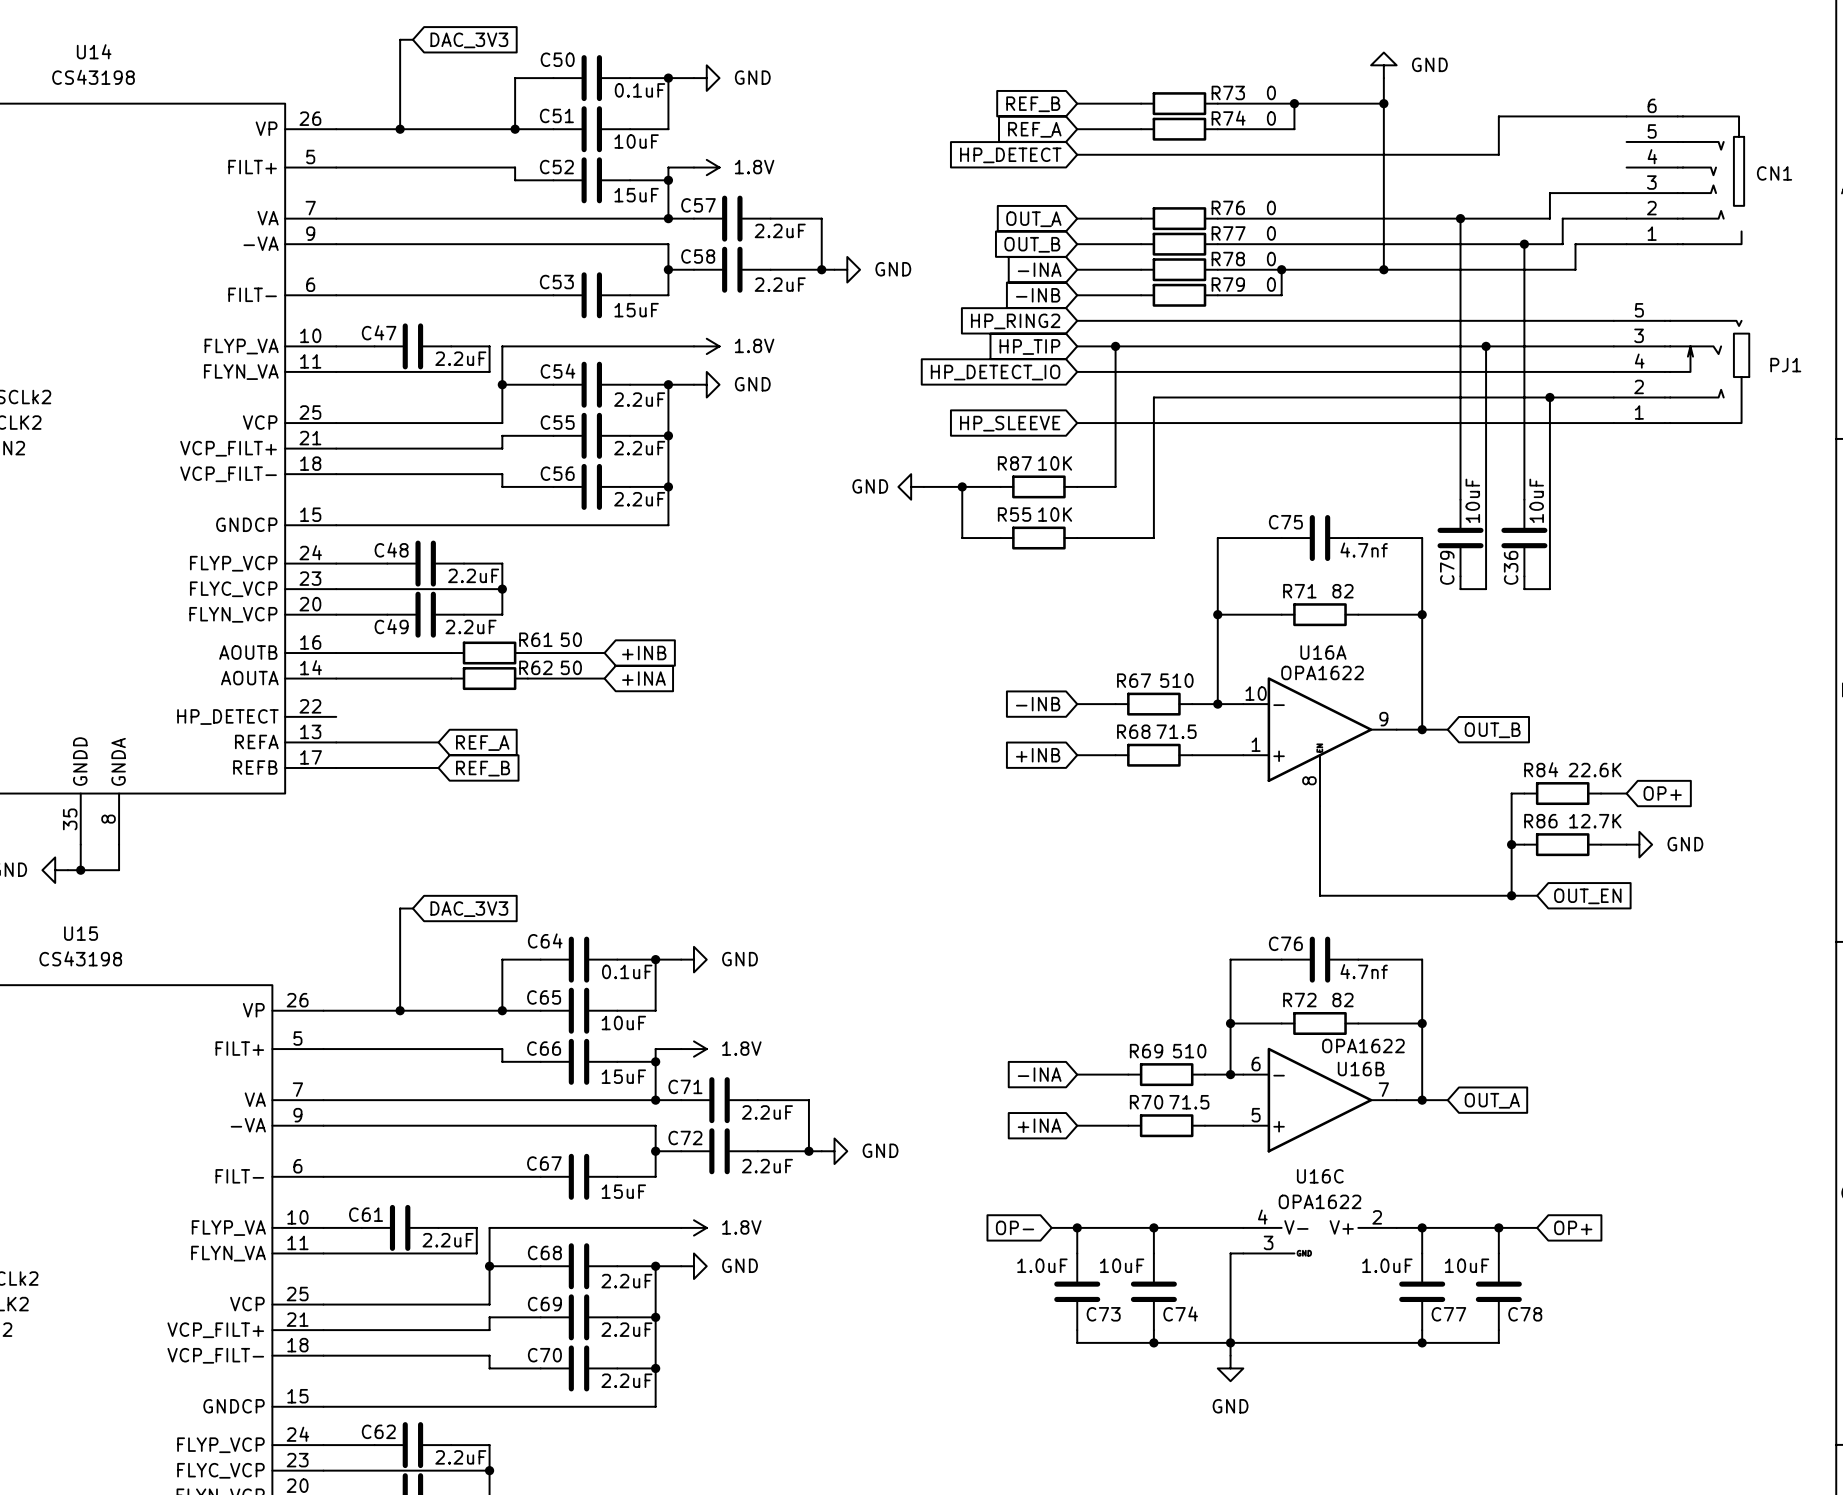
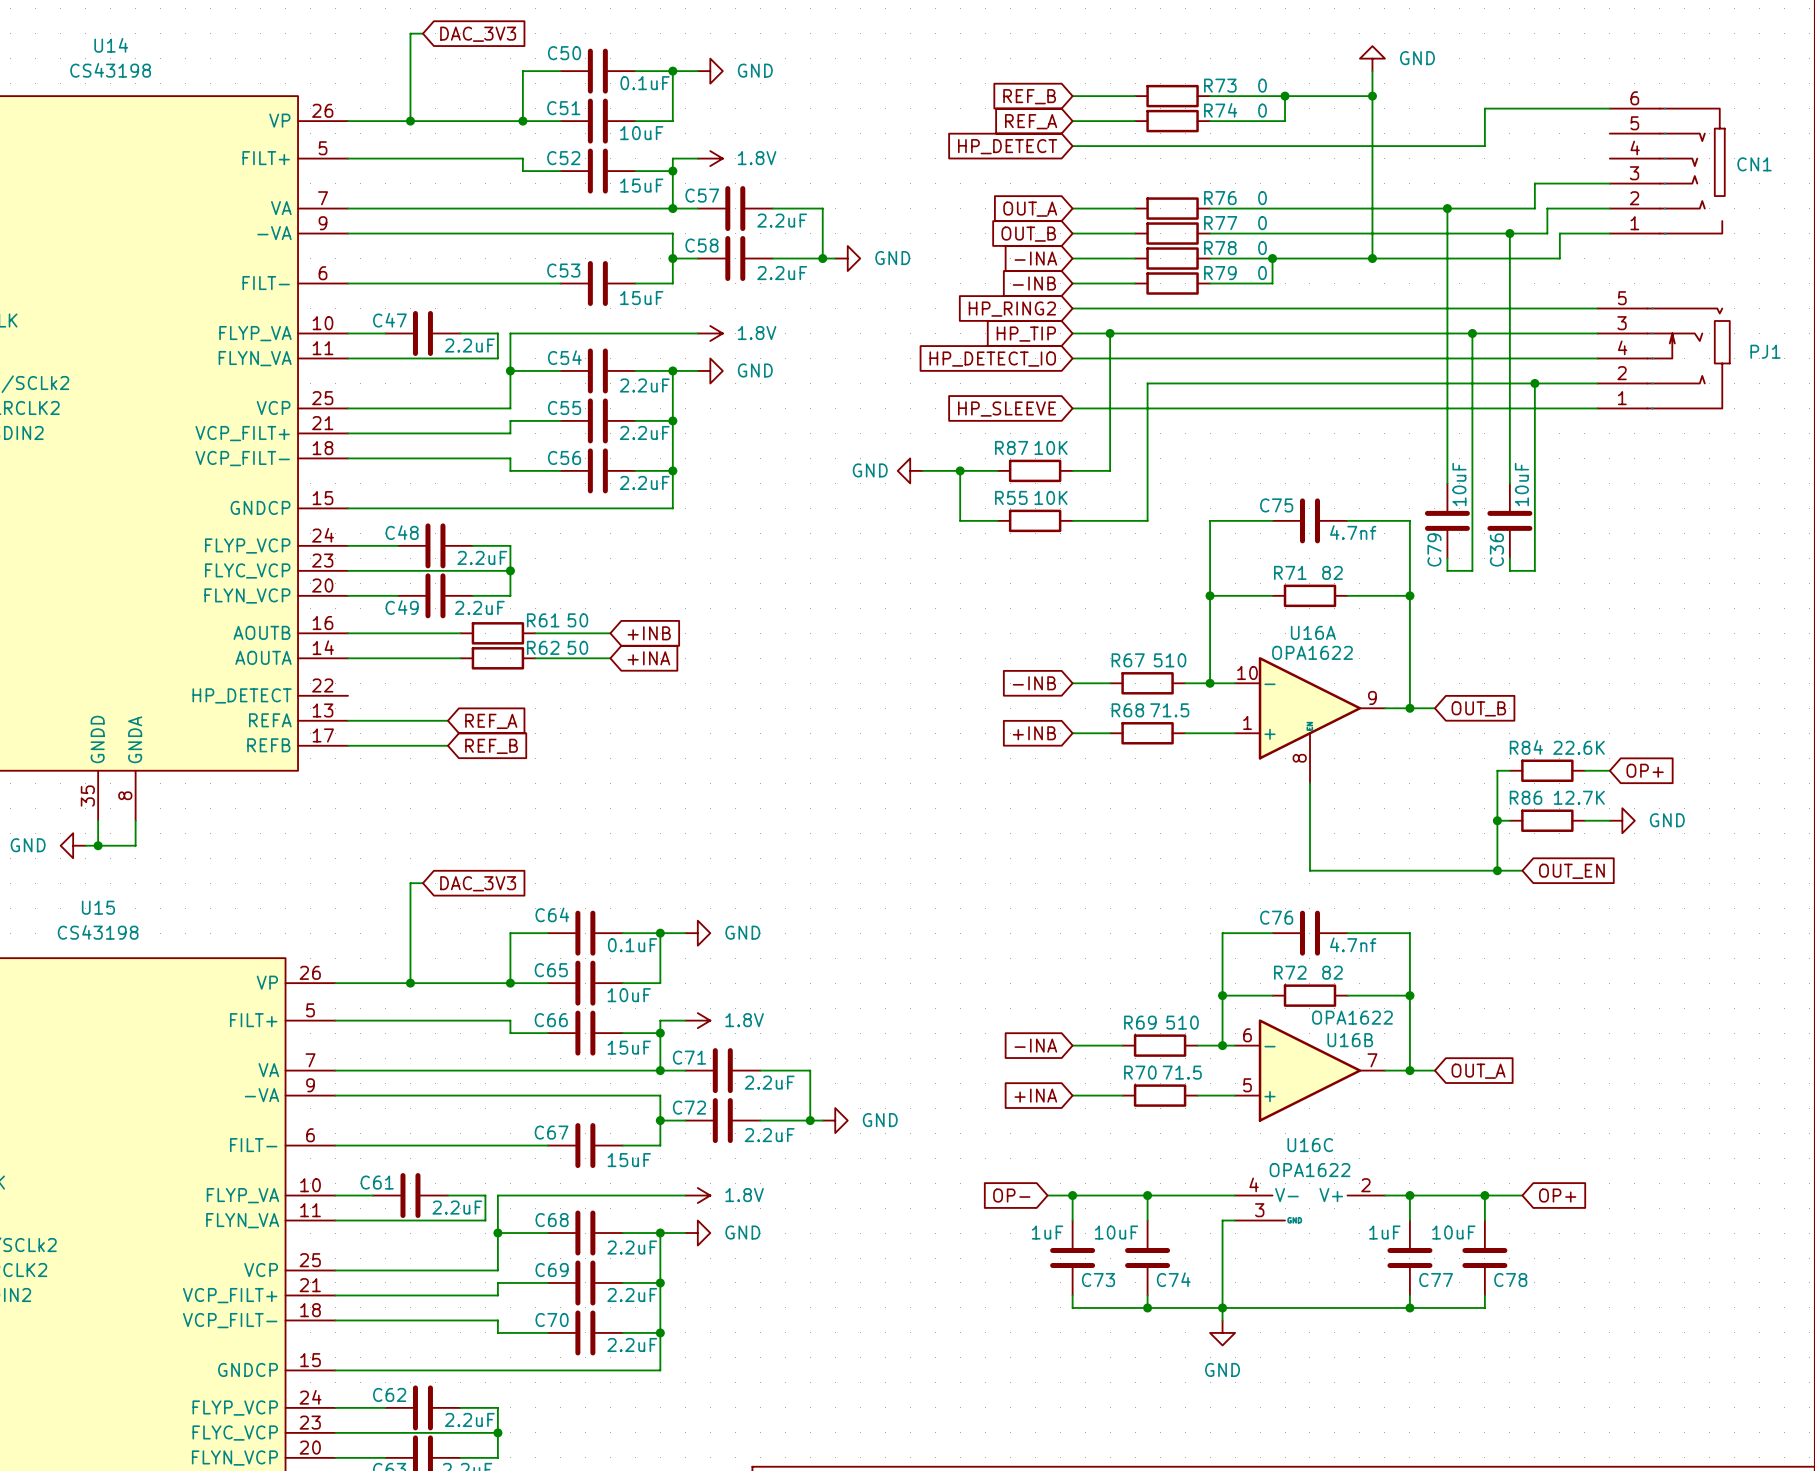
C73 value: 1.0uF (1042, 1265) -> 1uF (1047, 1232)
C77 value: 1.0uF (1387, 1265) -> 1uF (1384, 1232)

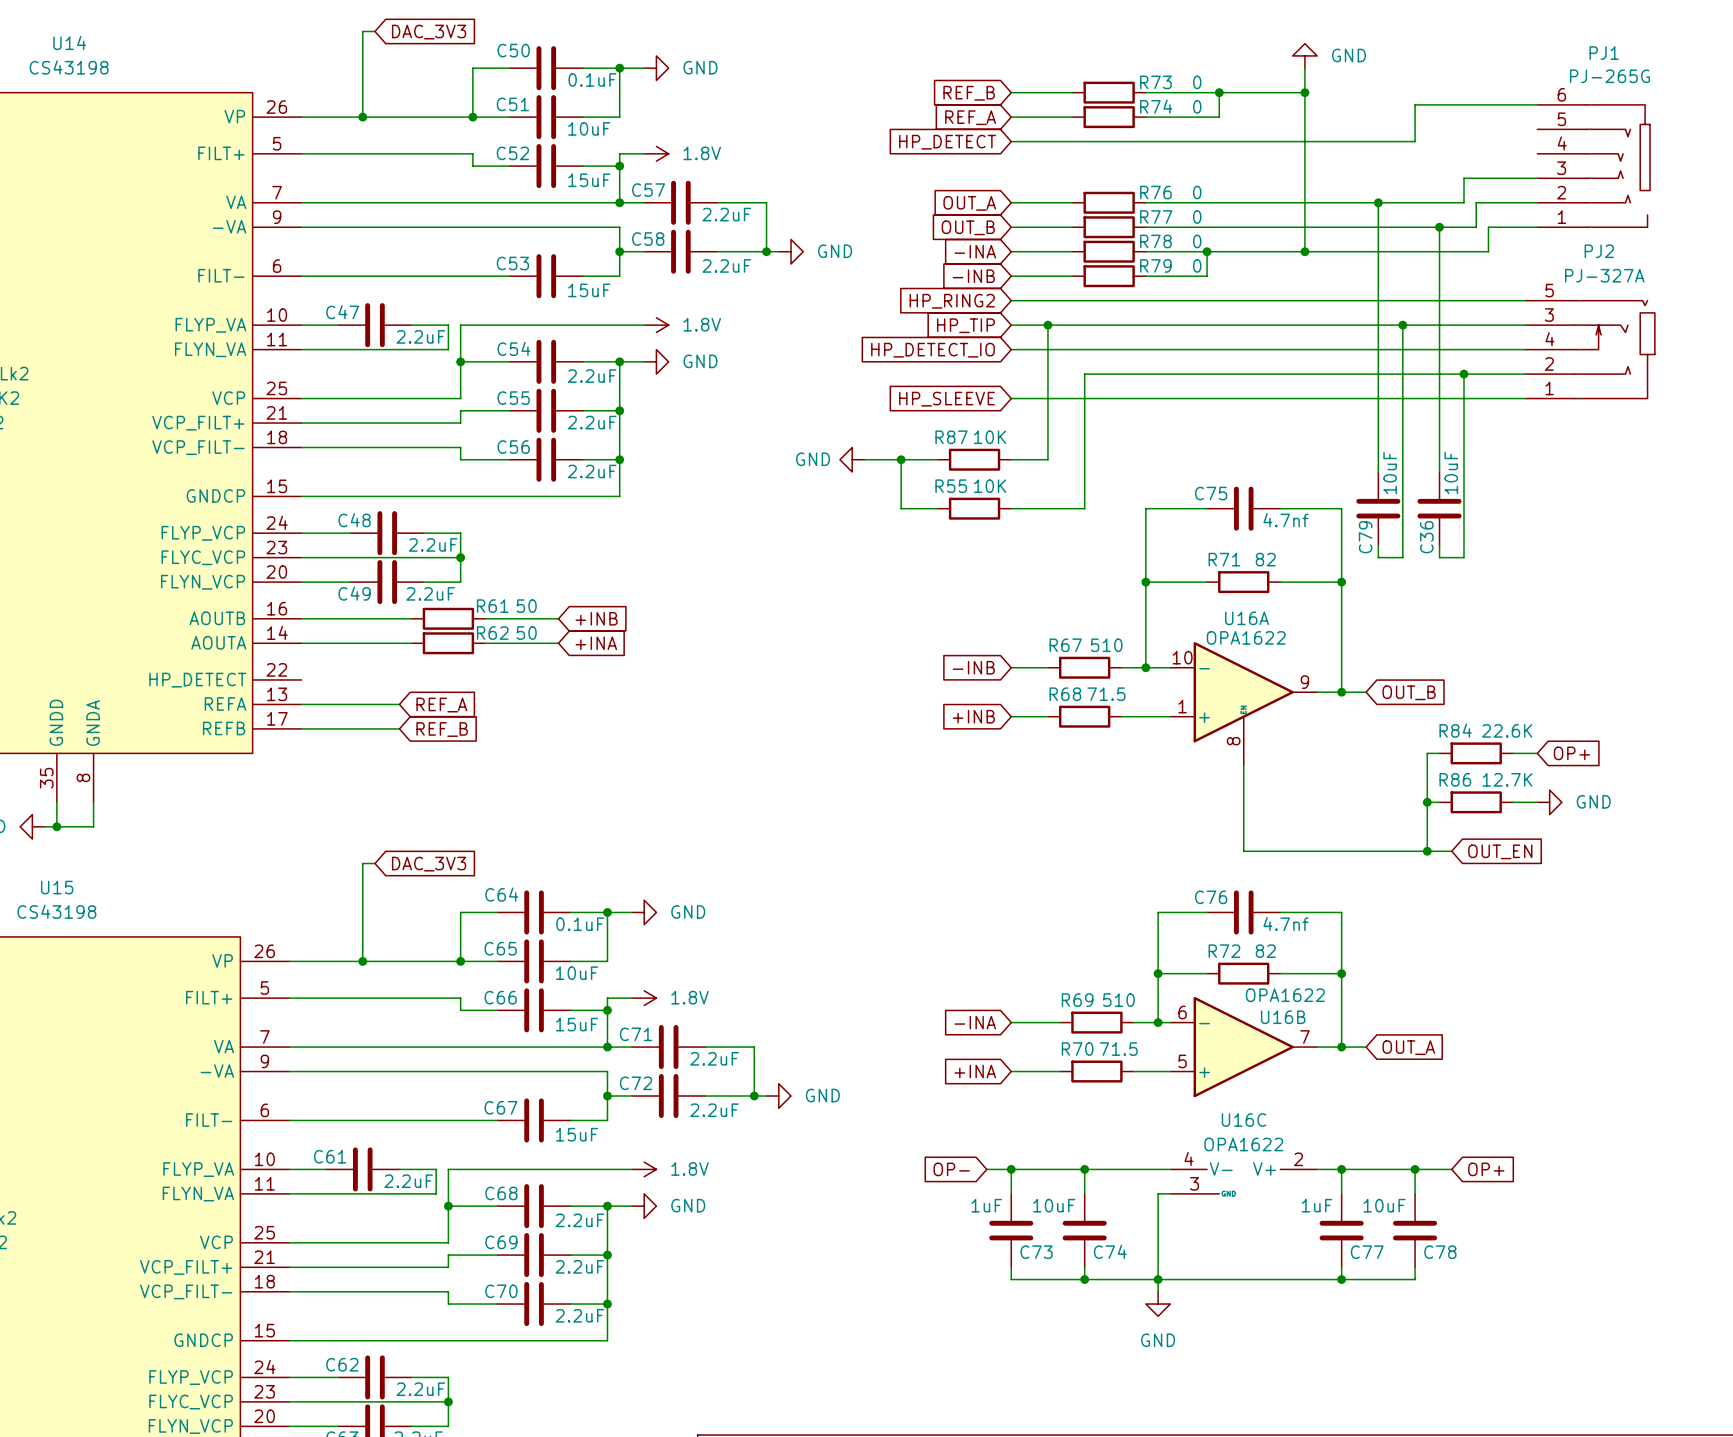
CN1 value: none -> PJ-265G (1609, 76)
CN1 name: CN1 (1754, 164) -> PJ1 (1604, 53)
PJ1 value: none -> PJ-327A (1604, 275)
PJ1 name: PJ1 (1765, 351) -> PJ2 (1599, 251)

